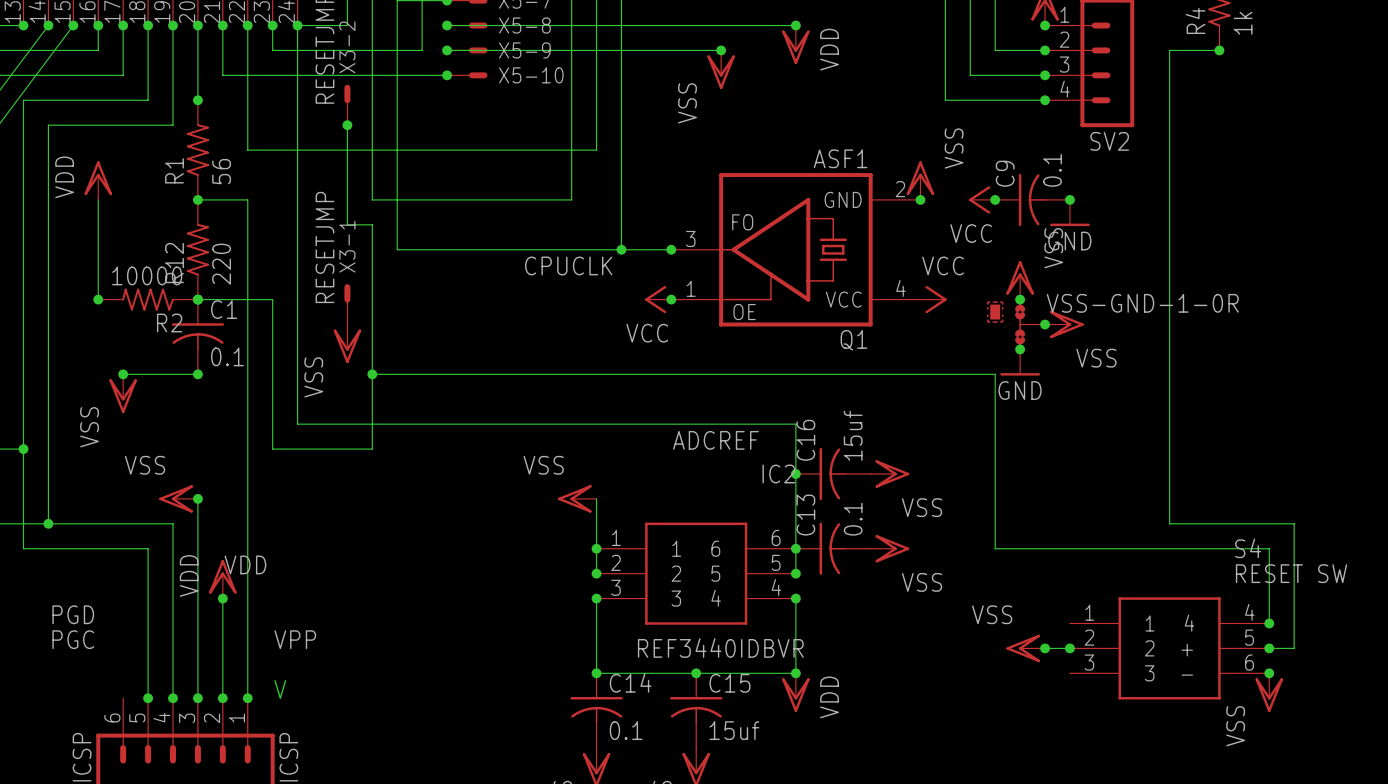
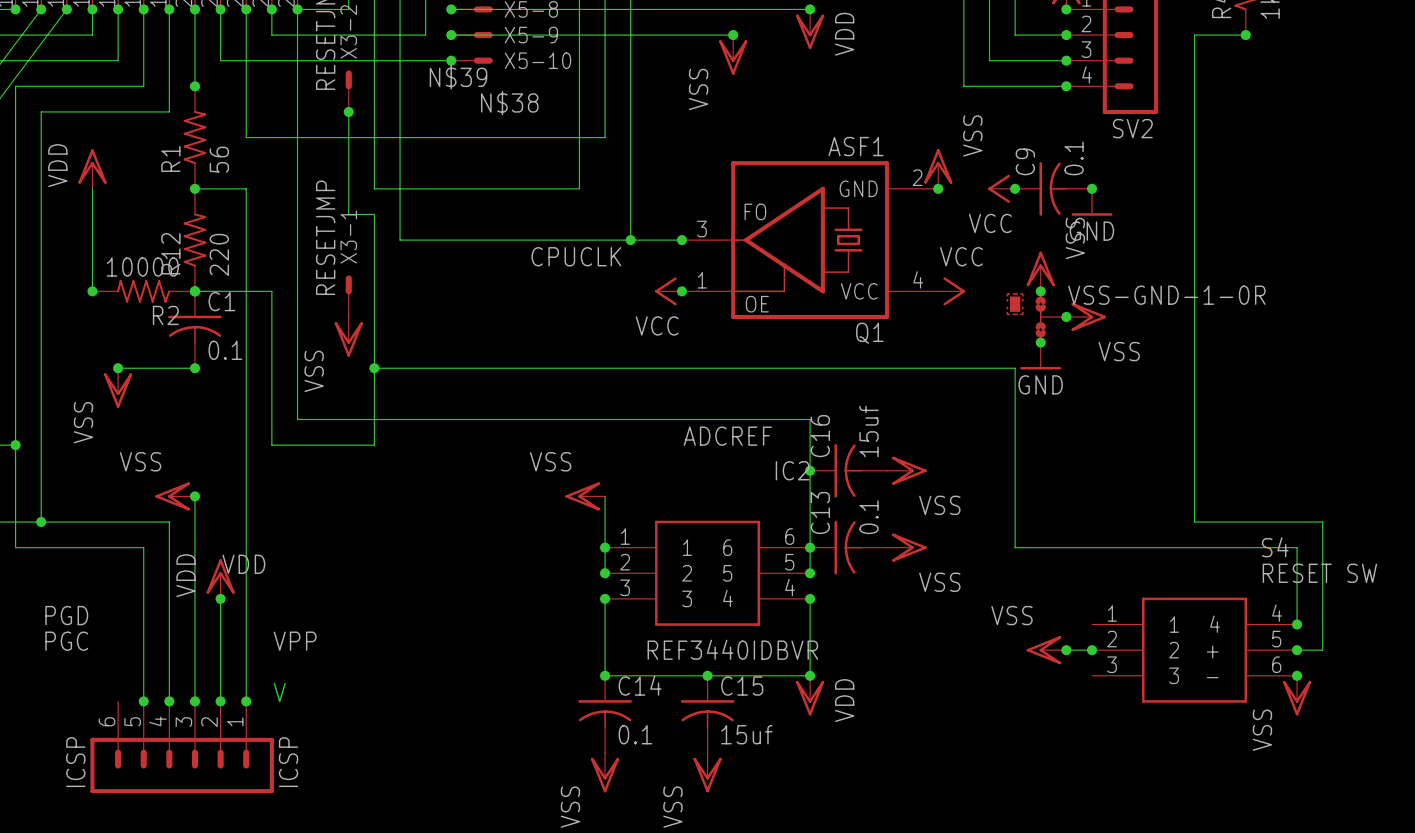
label: none -> N$39 (458, 77)
label: none -> N$38 (509, 102)

